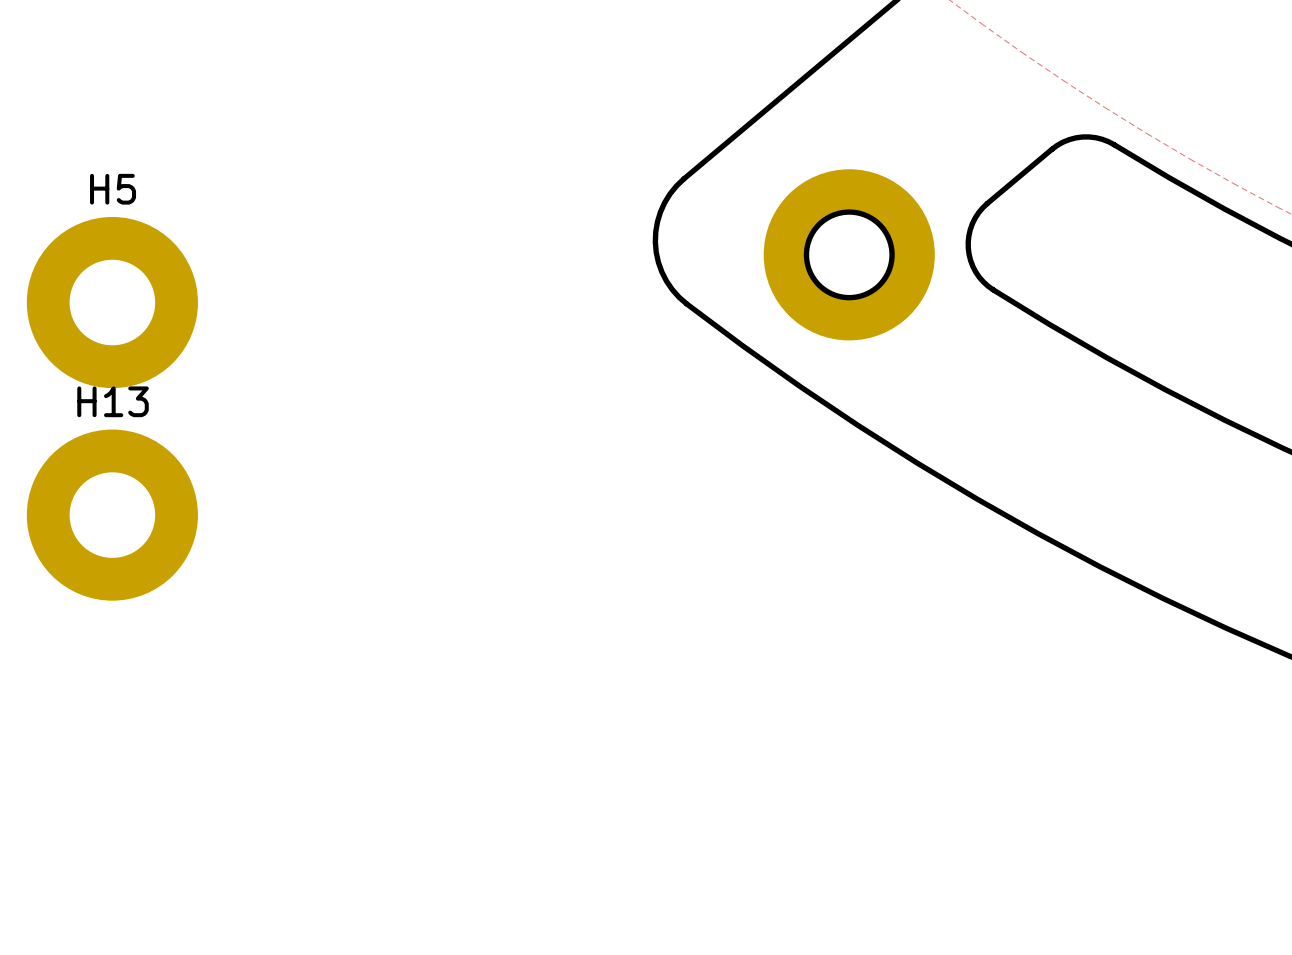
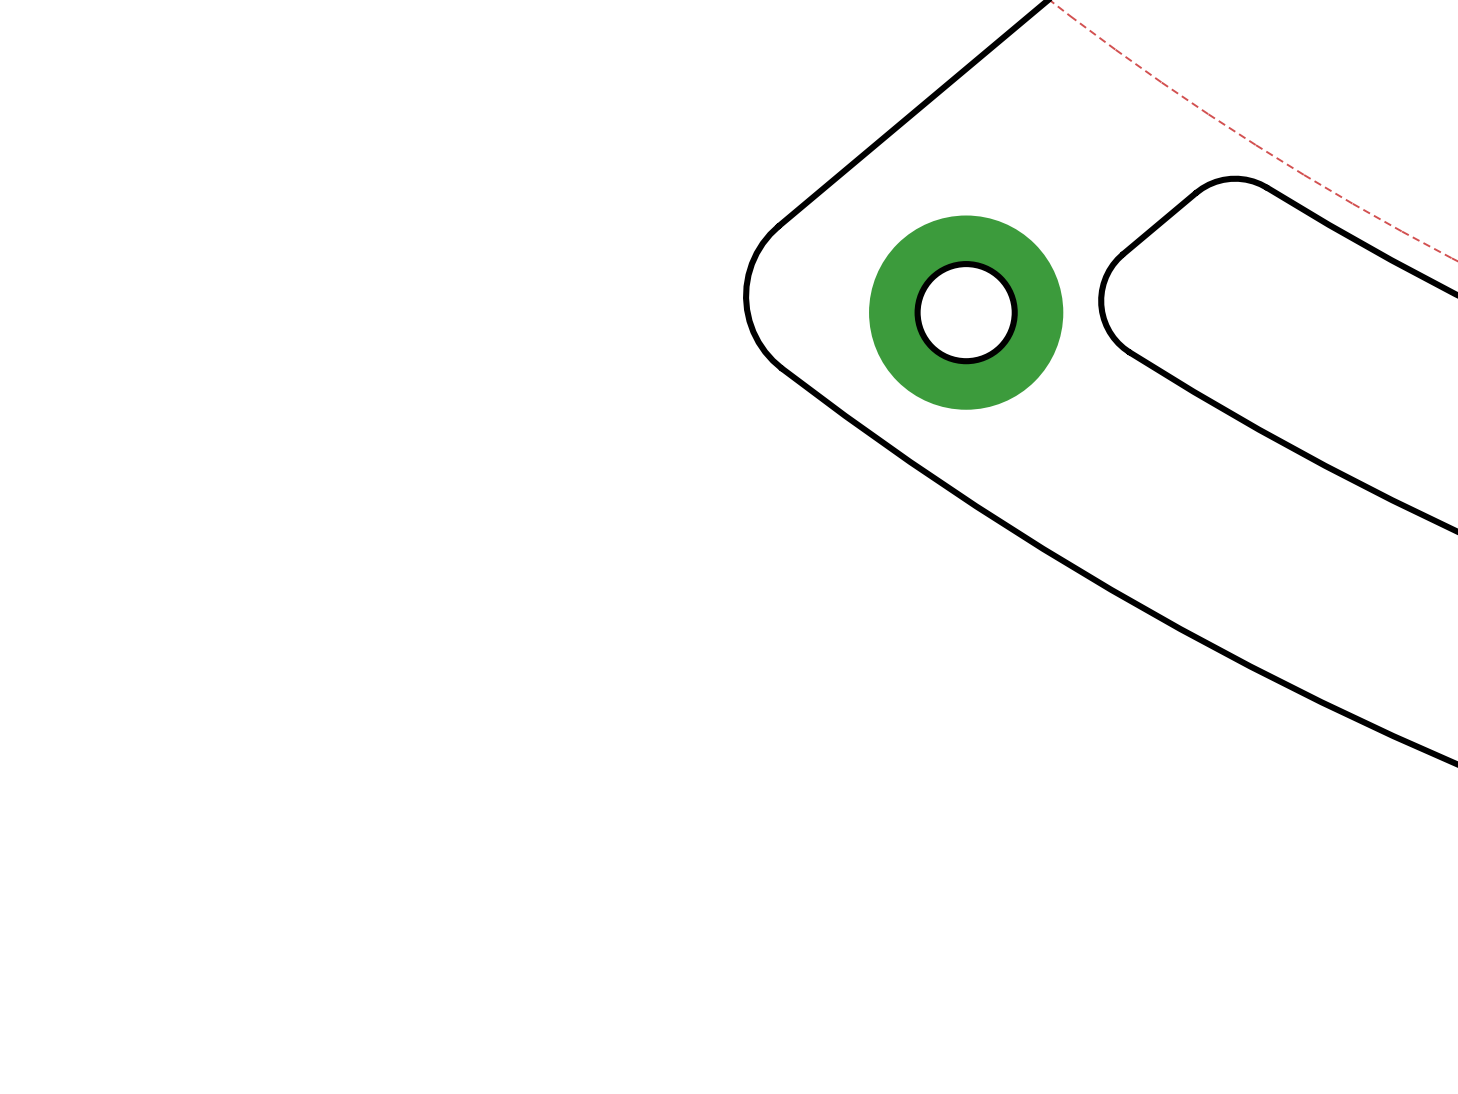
H5: (112, 302) -> none
H13: (112, 515) -> none

